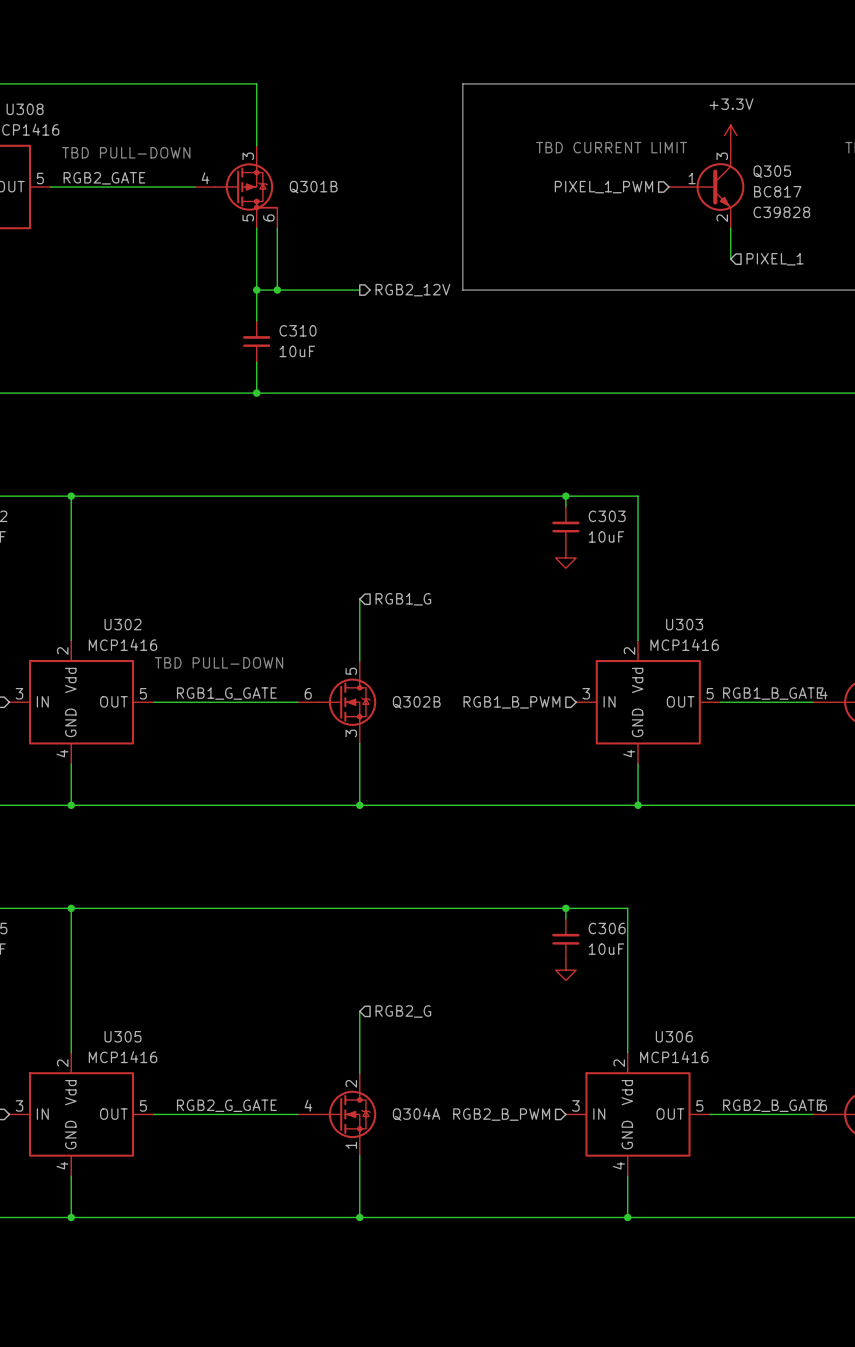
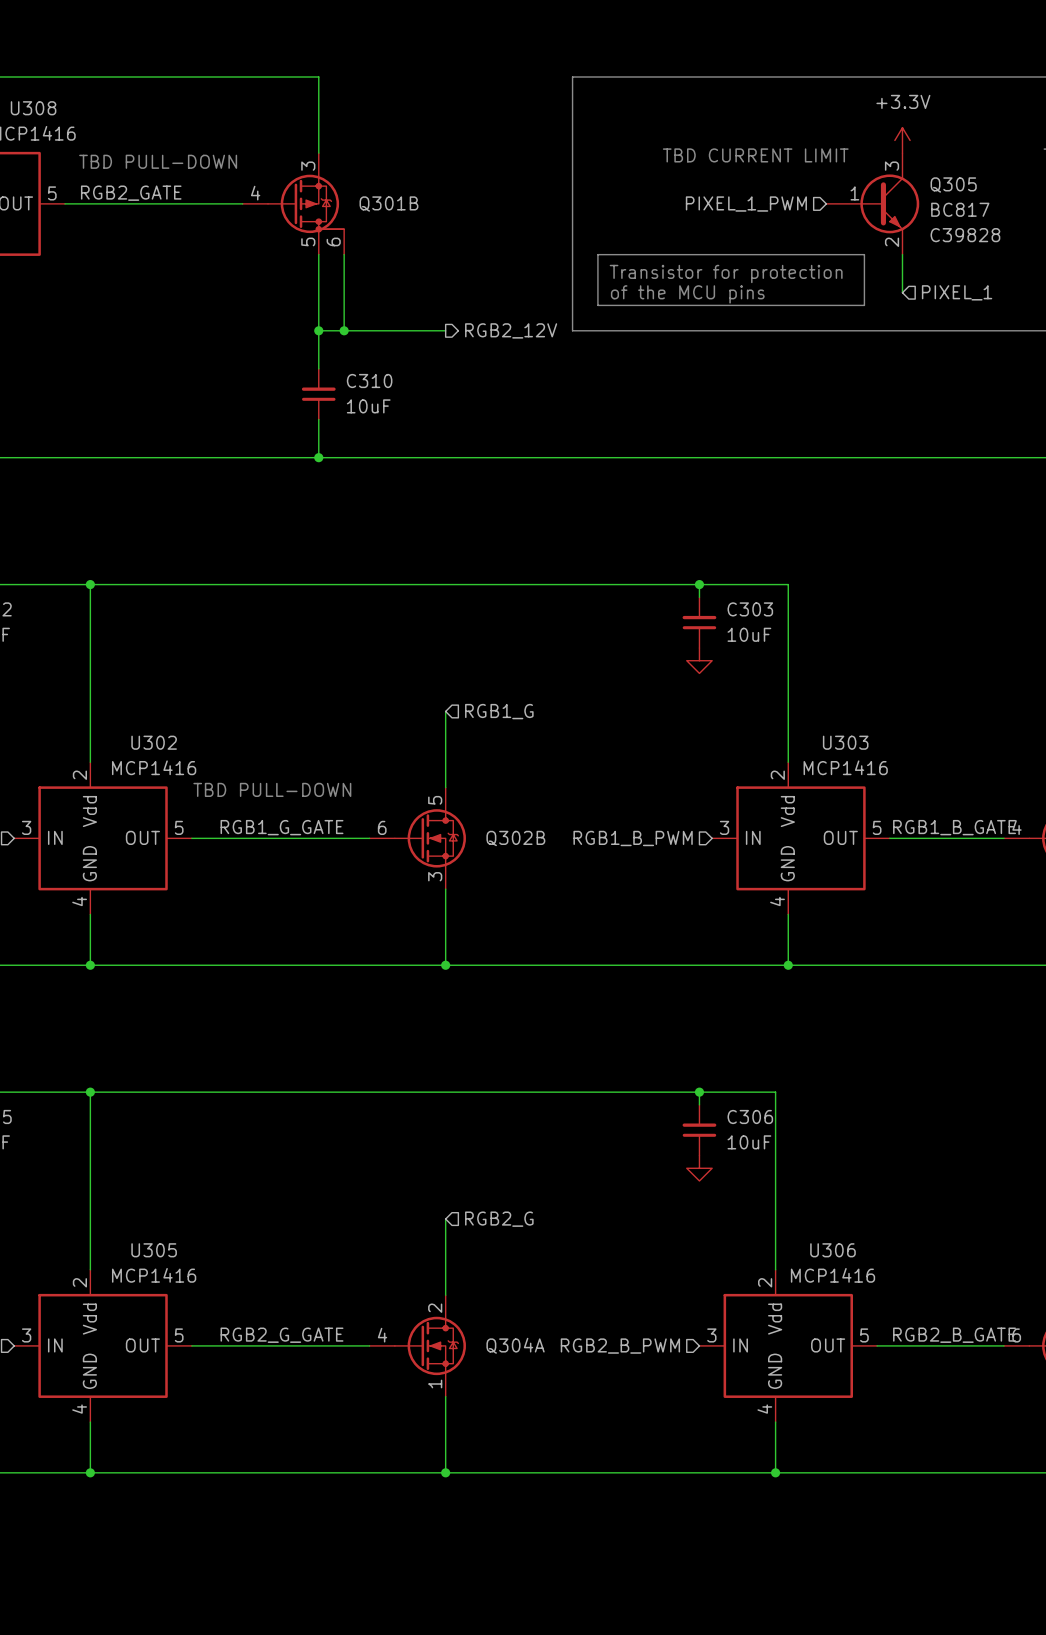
line: none -> (597, 254) (864, 254) (864, 305) (597, 305) (597, 254)
text: none -> Transistor for protection (726, 273)
text: none -> of the MCU pins (687, 294)

